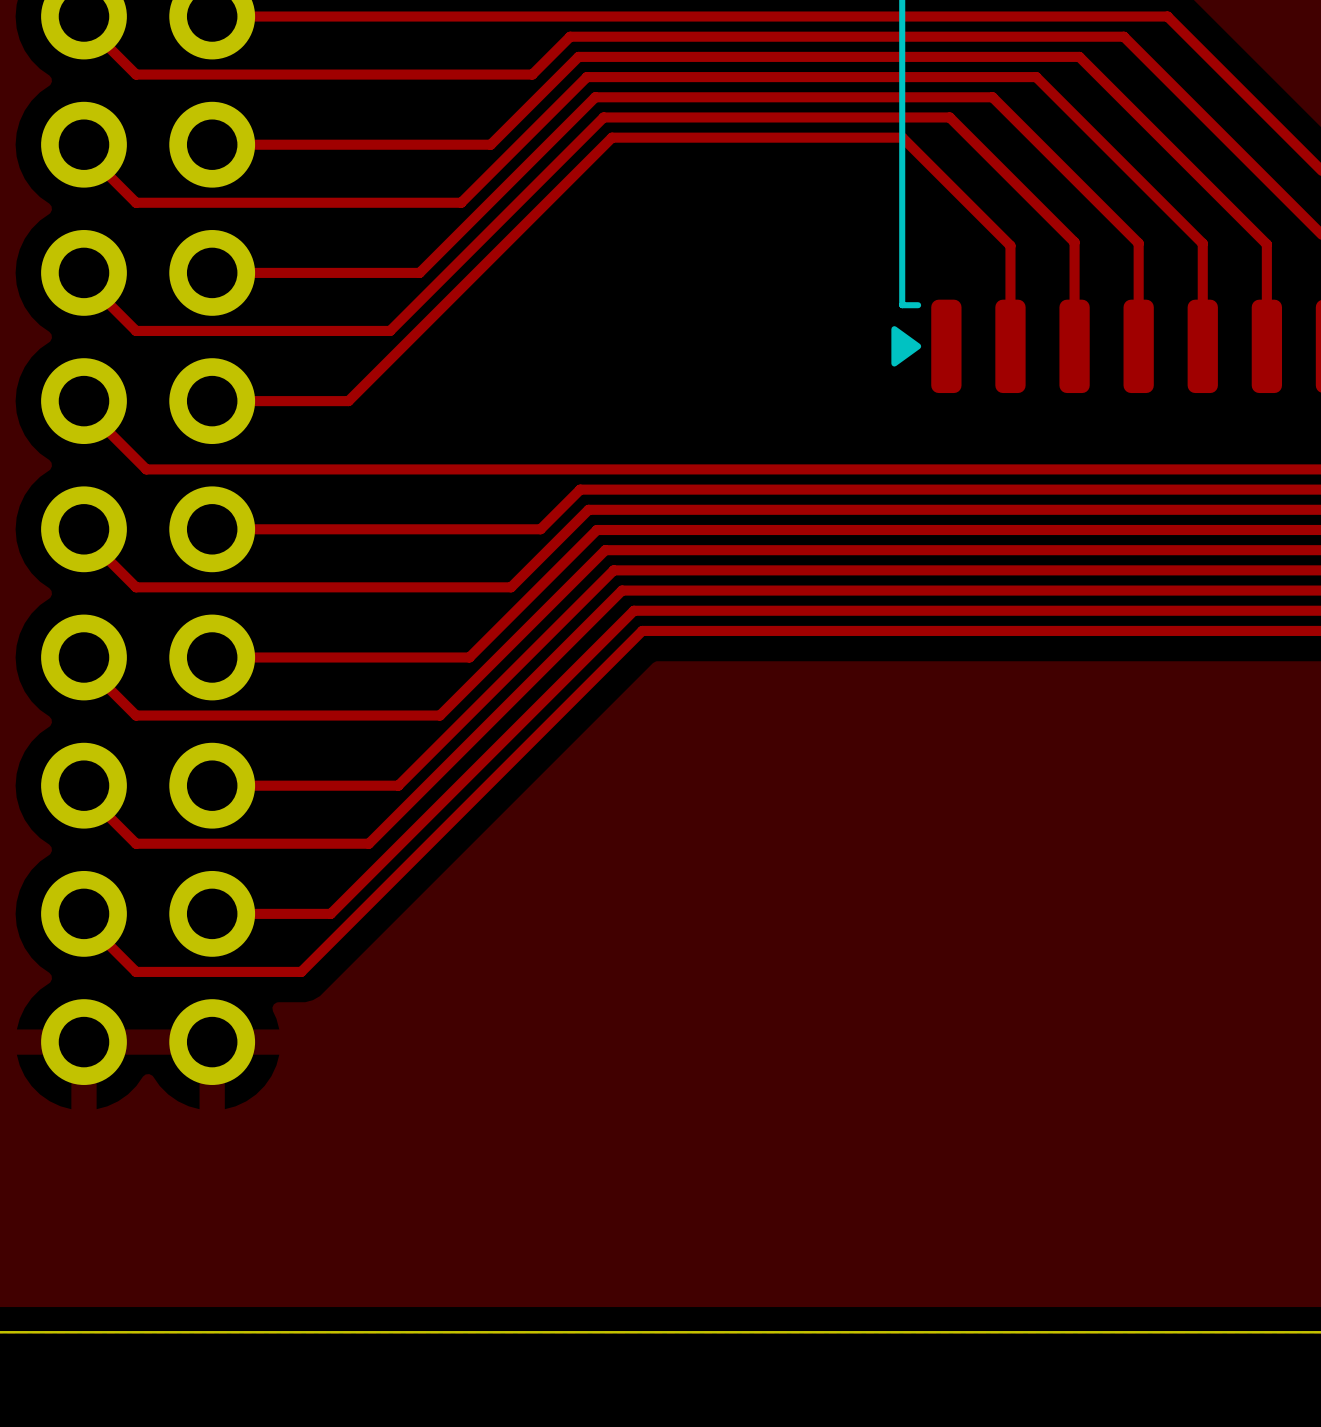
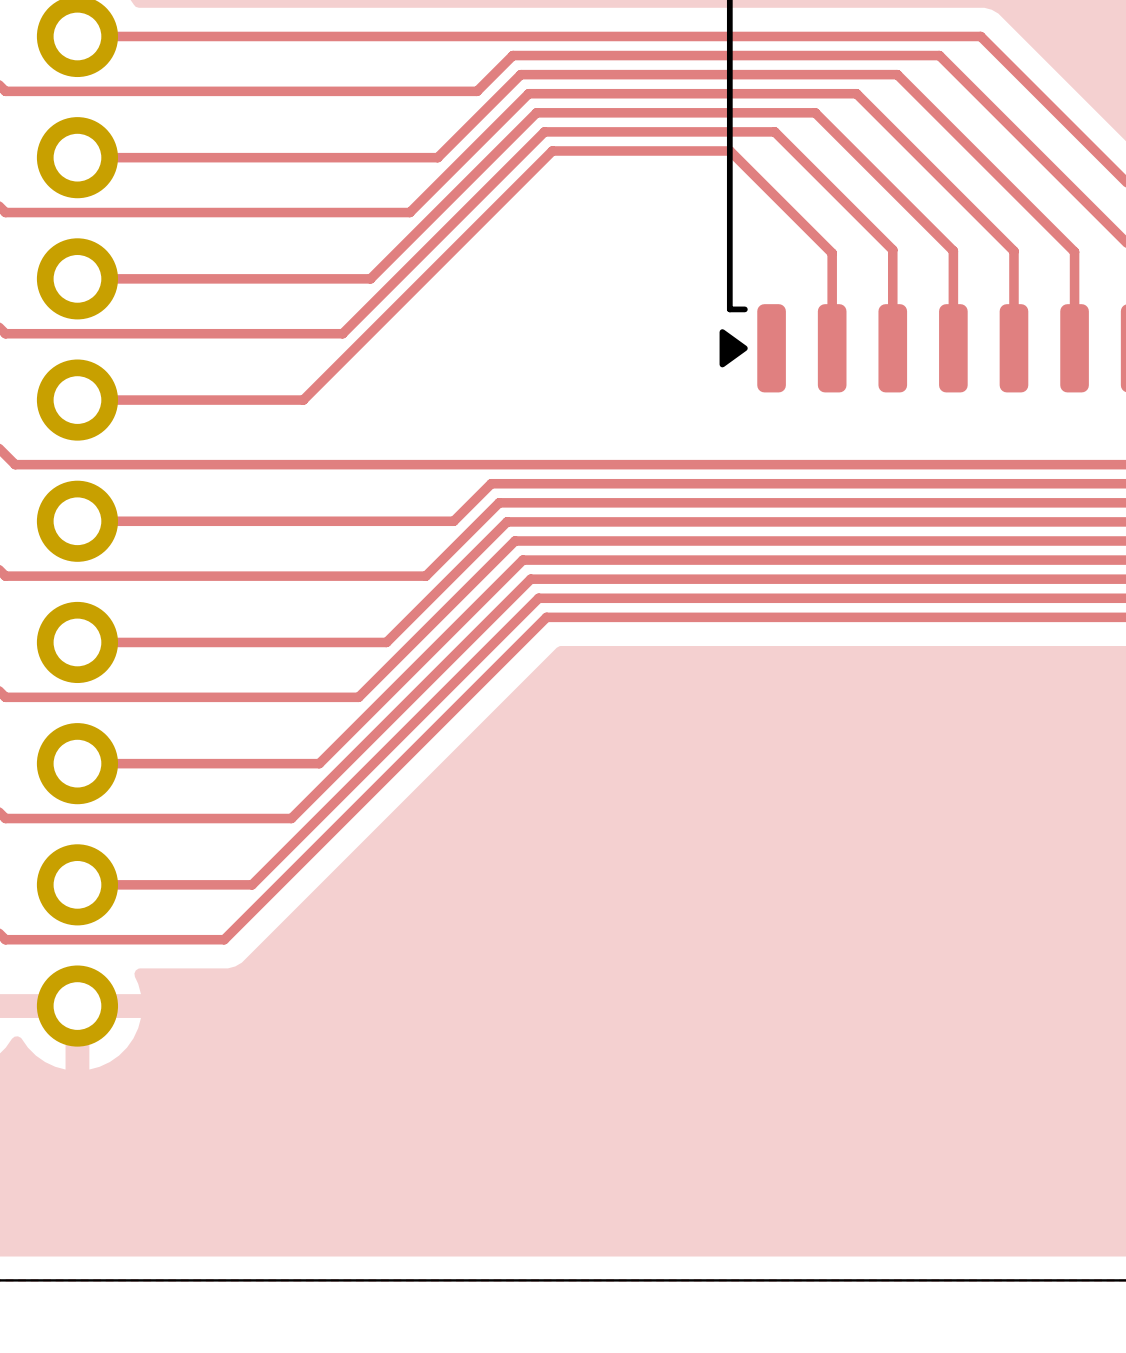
track: (672, 36) (570, 36) (532, 74) -> (512, 55) (477, 91) (380, 91)
track: (681, 56) (578, 56) (490, 144) -> (520, 74) (437, 157) (340, 157)
track: (689, 77) (586, 77) (461, 202) -> (528, 93) (409, 212) (312, 212)
track: (697, 97) (595, 97) (419, 272) -> (536, 112) (370, 278) (273, 278)
track: (706, 117) (603, 117) (390, 330) -> (544, 131) (342, 333) (245, 333)
track: (714, 137) (612, 137) (348, 401) -> (552, 150) (303, 400) (206, 400)
track: (649, 489) (580, 489) (540, 529) -> (491, 483) (453, 521) (387, 521)
track: (658, 509) (588, 509) (511, 587) -> (499, 502) (425, 576) (360, 576)
track: (666, 529) (596, 529) (469, 657) -> (507, 521) (386, 642) (320, 642)
track: (674, 550) (605, 550) (439, 715) -> (514, 541) (358, 697) (292, 697)
track: (683, 570) (613, 570) (398, 785) -> (522, 560) (319, 763) (253, 763)
track: (691, 590) (622, 590) (368, 843) -> (530, 579) (291, 818) (225, 818)
track: (700, 610) (633, 610) (330, 913) -> (538, 598) (252, 884) (189, 884)
track: (708, 630) (642, 630) (301, 971) -> (546, 617) (224, 939) (161, 939)

